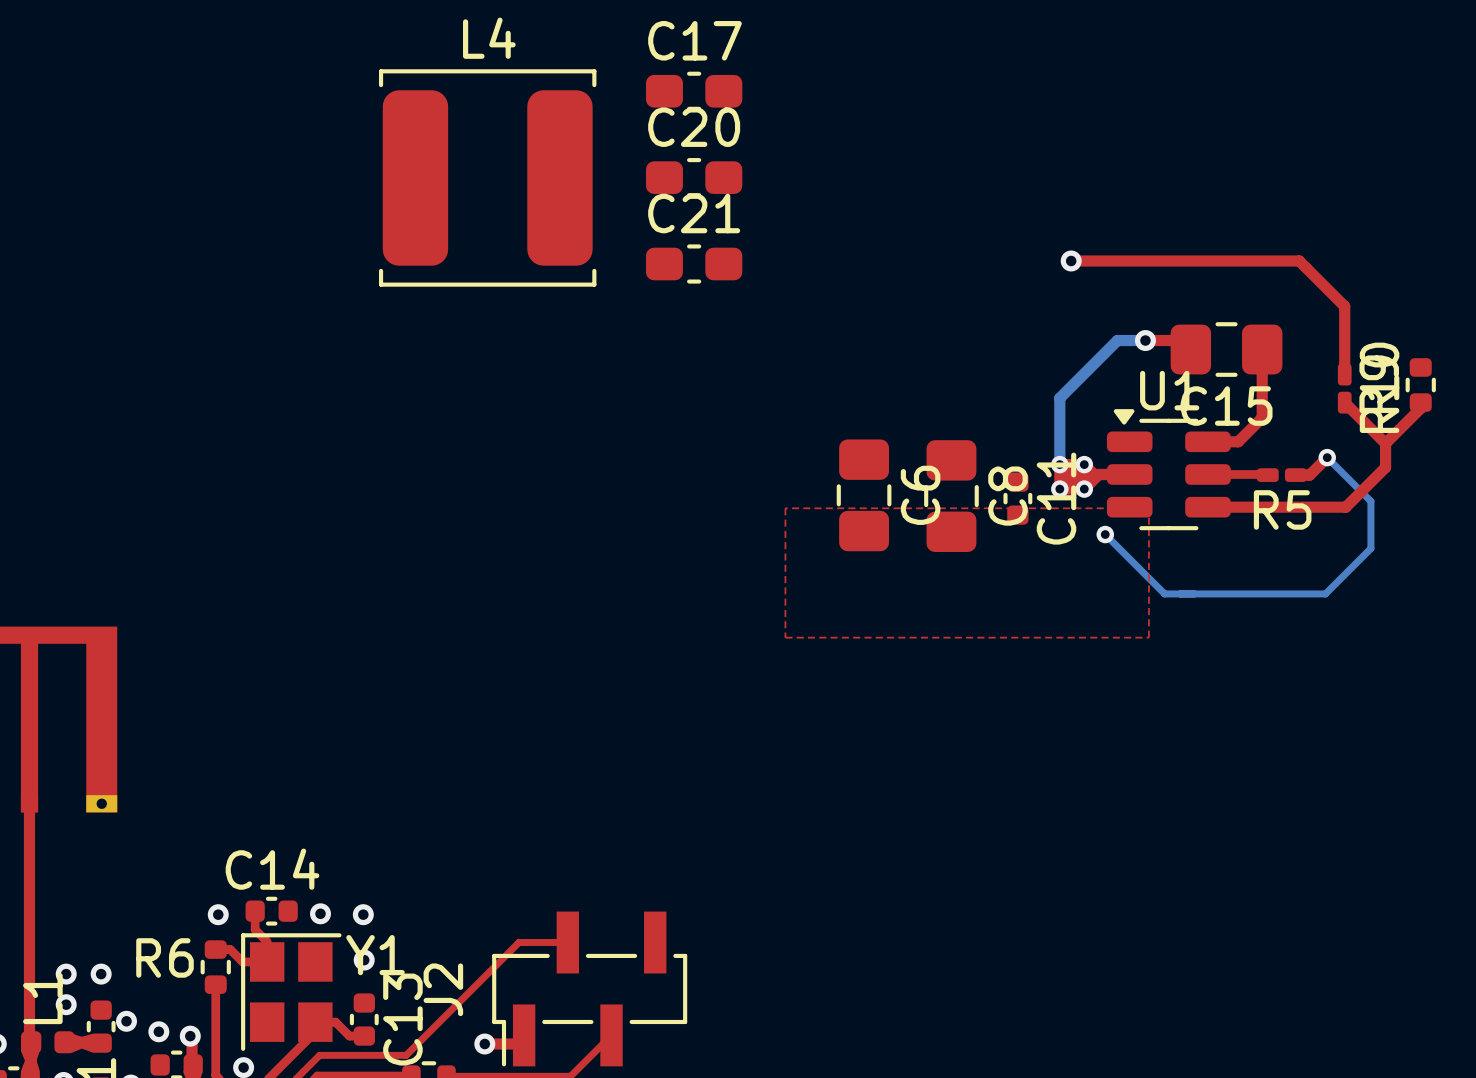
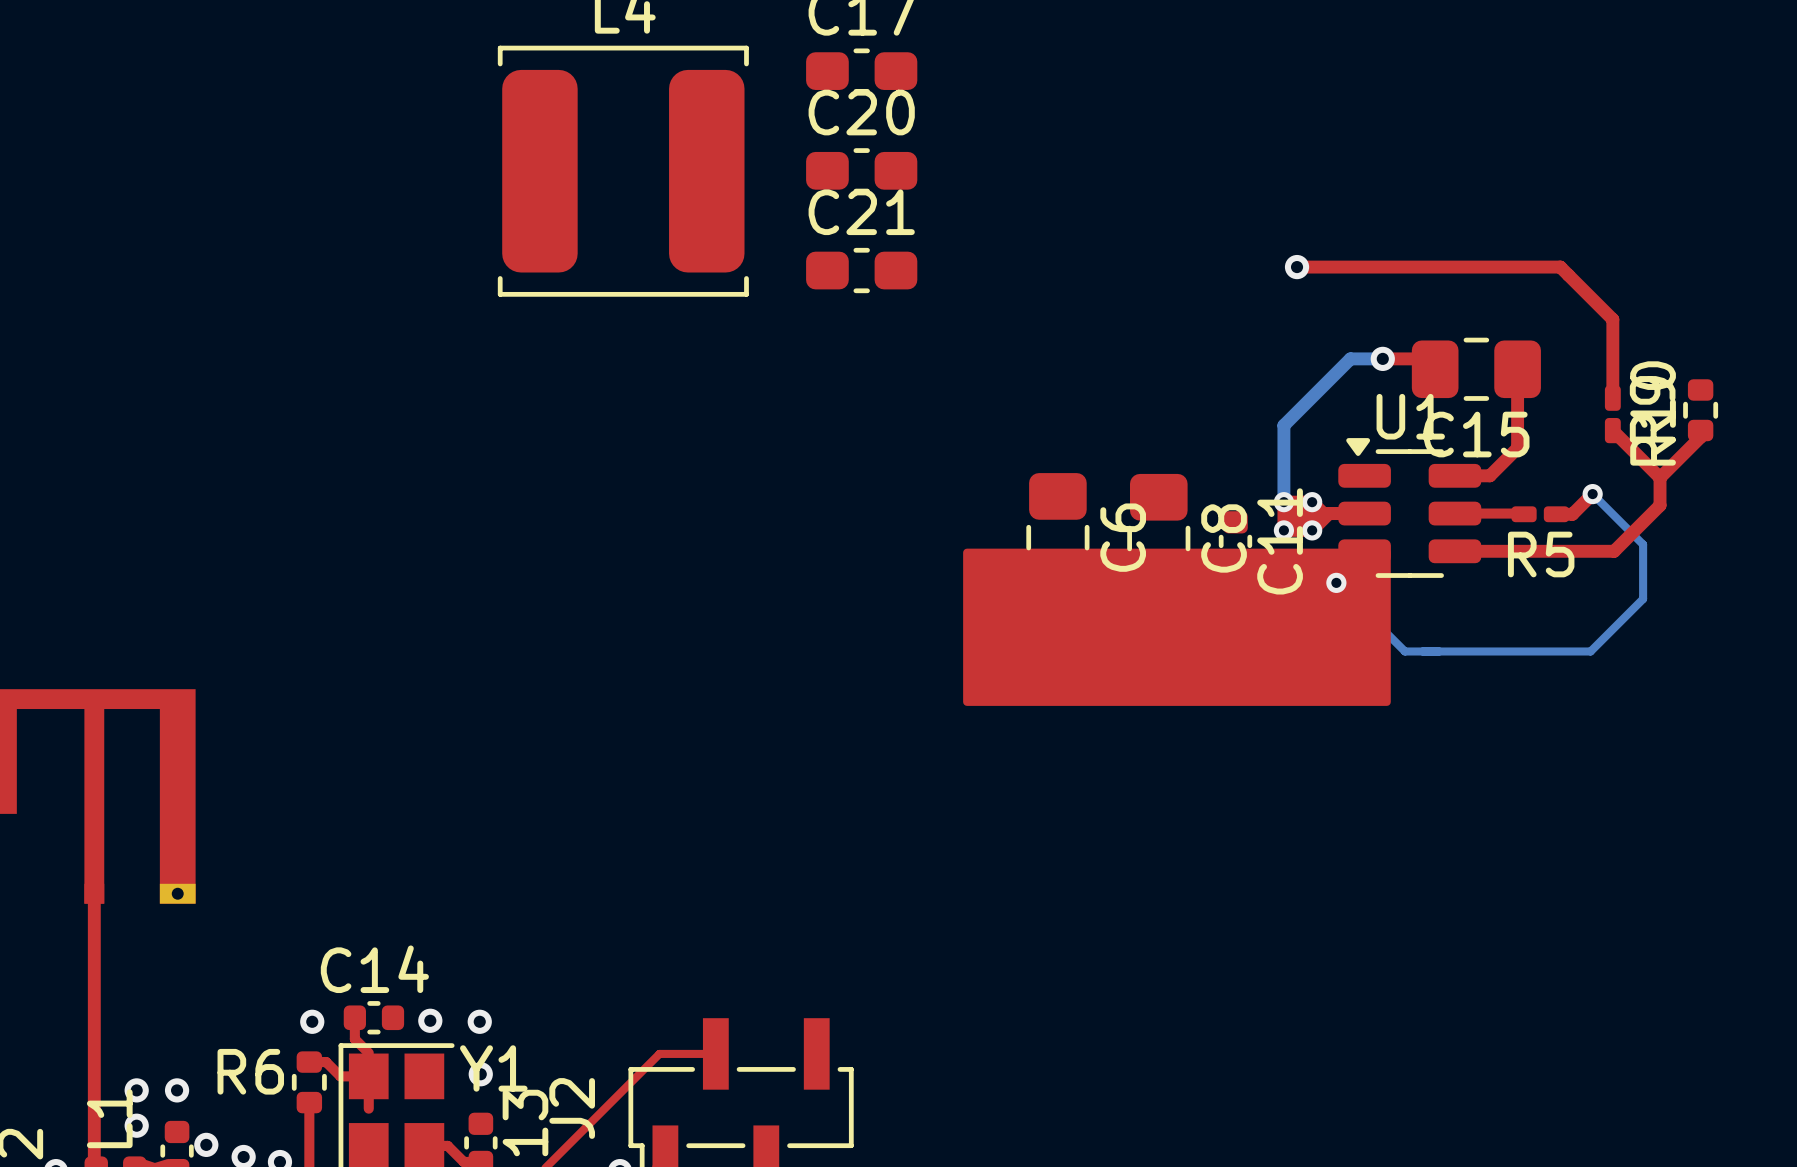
drawing: none -> [963, 548, 1391, 706]
top zone outline: (785, 508) (785, 637) (1148, 637) (1148, 508) (785, 508) -> none
top track: none -> (368, 1085) (368, 1108)

